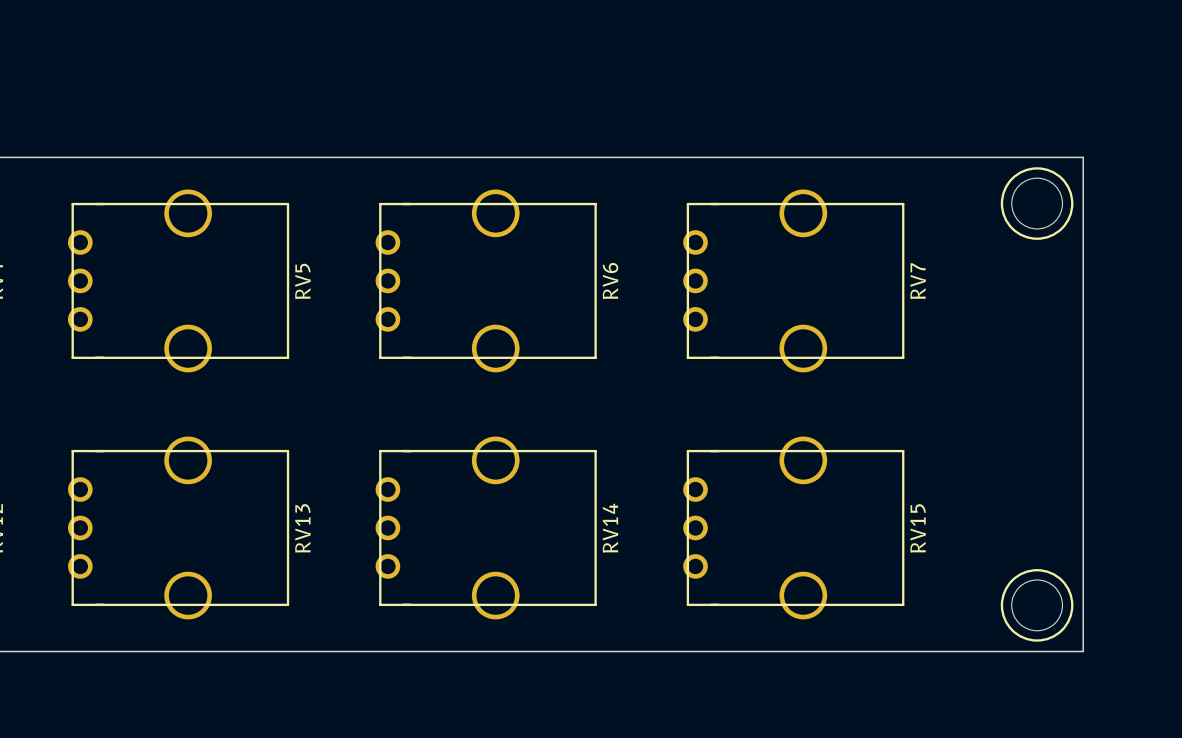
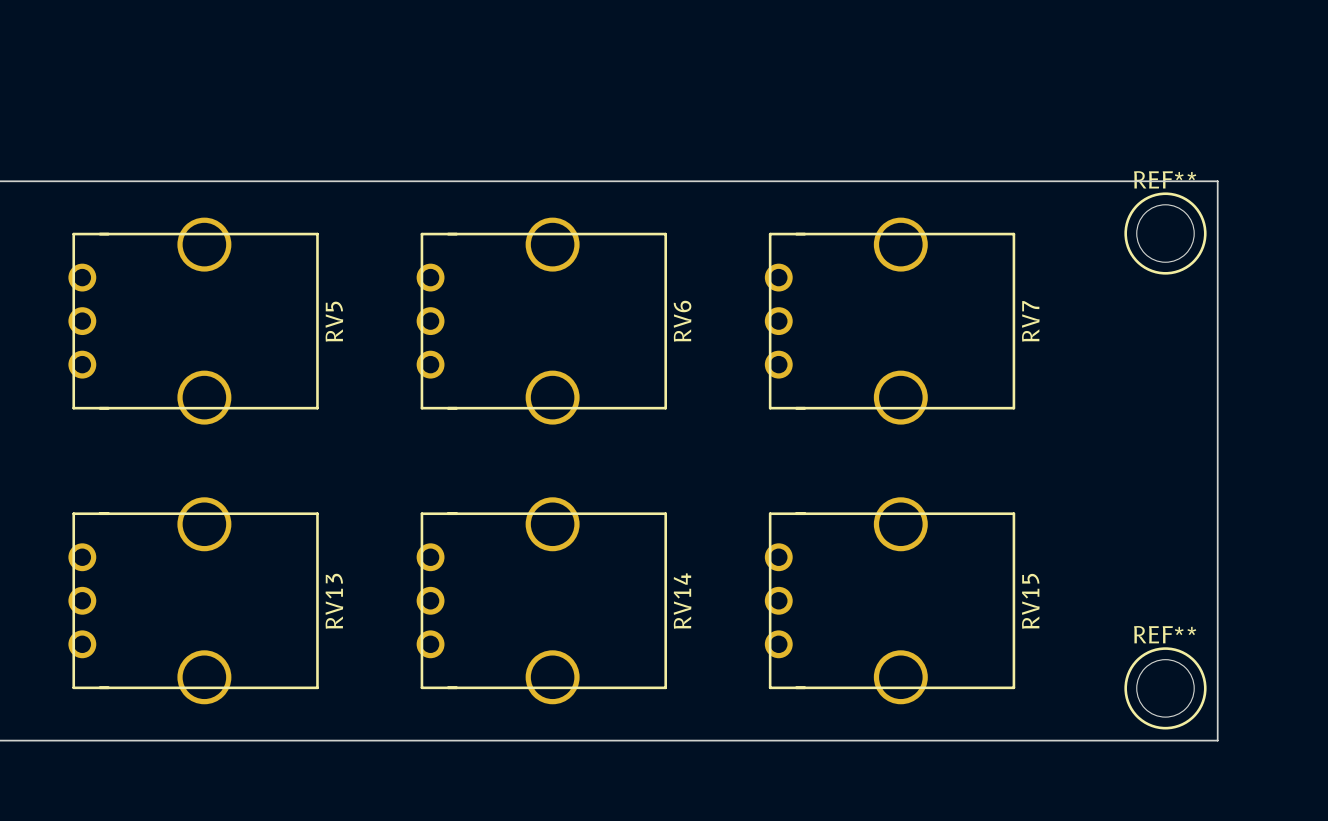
REF** name: none -> REF** (1165, 179)
REF** name: none -> REF** (1165, 634)

